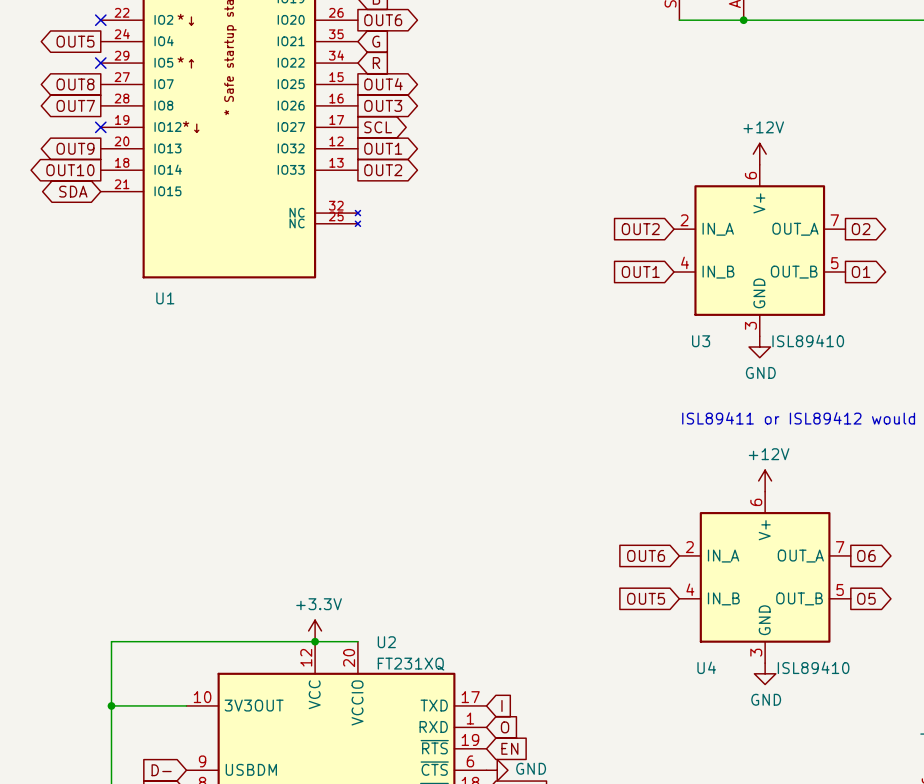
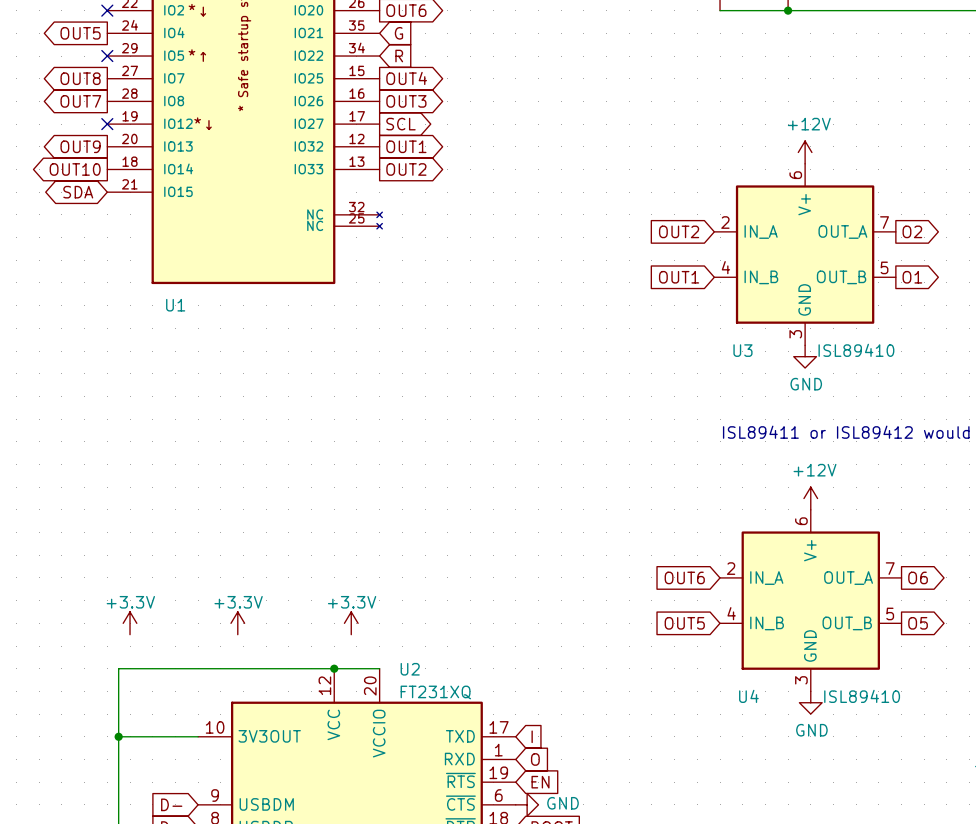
power symbol: none -> +3.3V (130, 623)
power symbol: none -> +3.3V (237, 623)
power symbol text position: +3.3V (319, 604) -> +3.3V (352, 602)
power symbol position: +3.3V (315, 630) -> +3.3V (351, 623)

